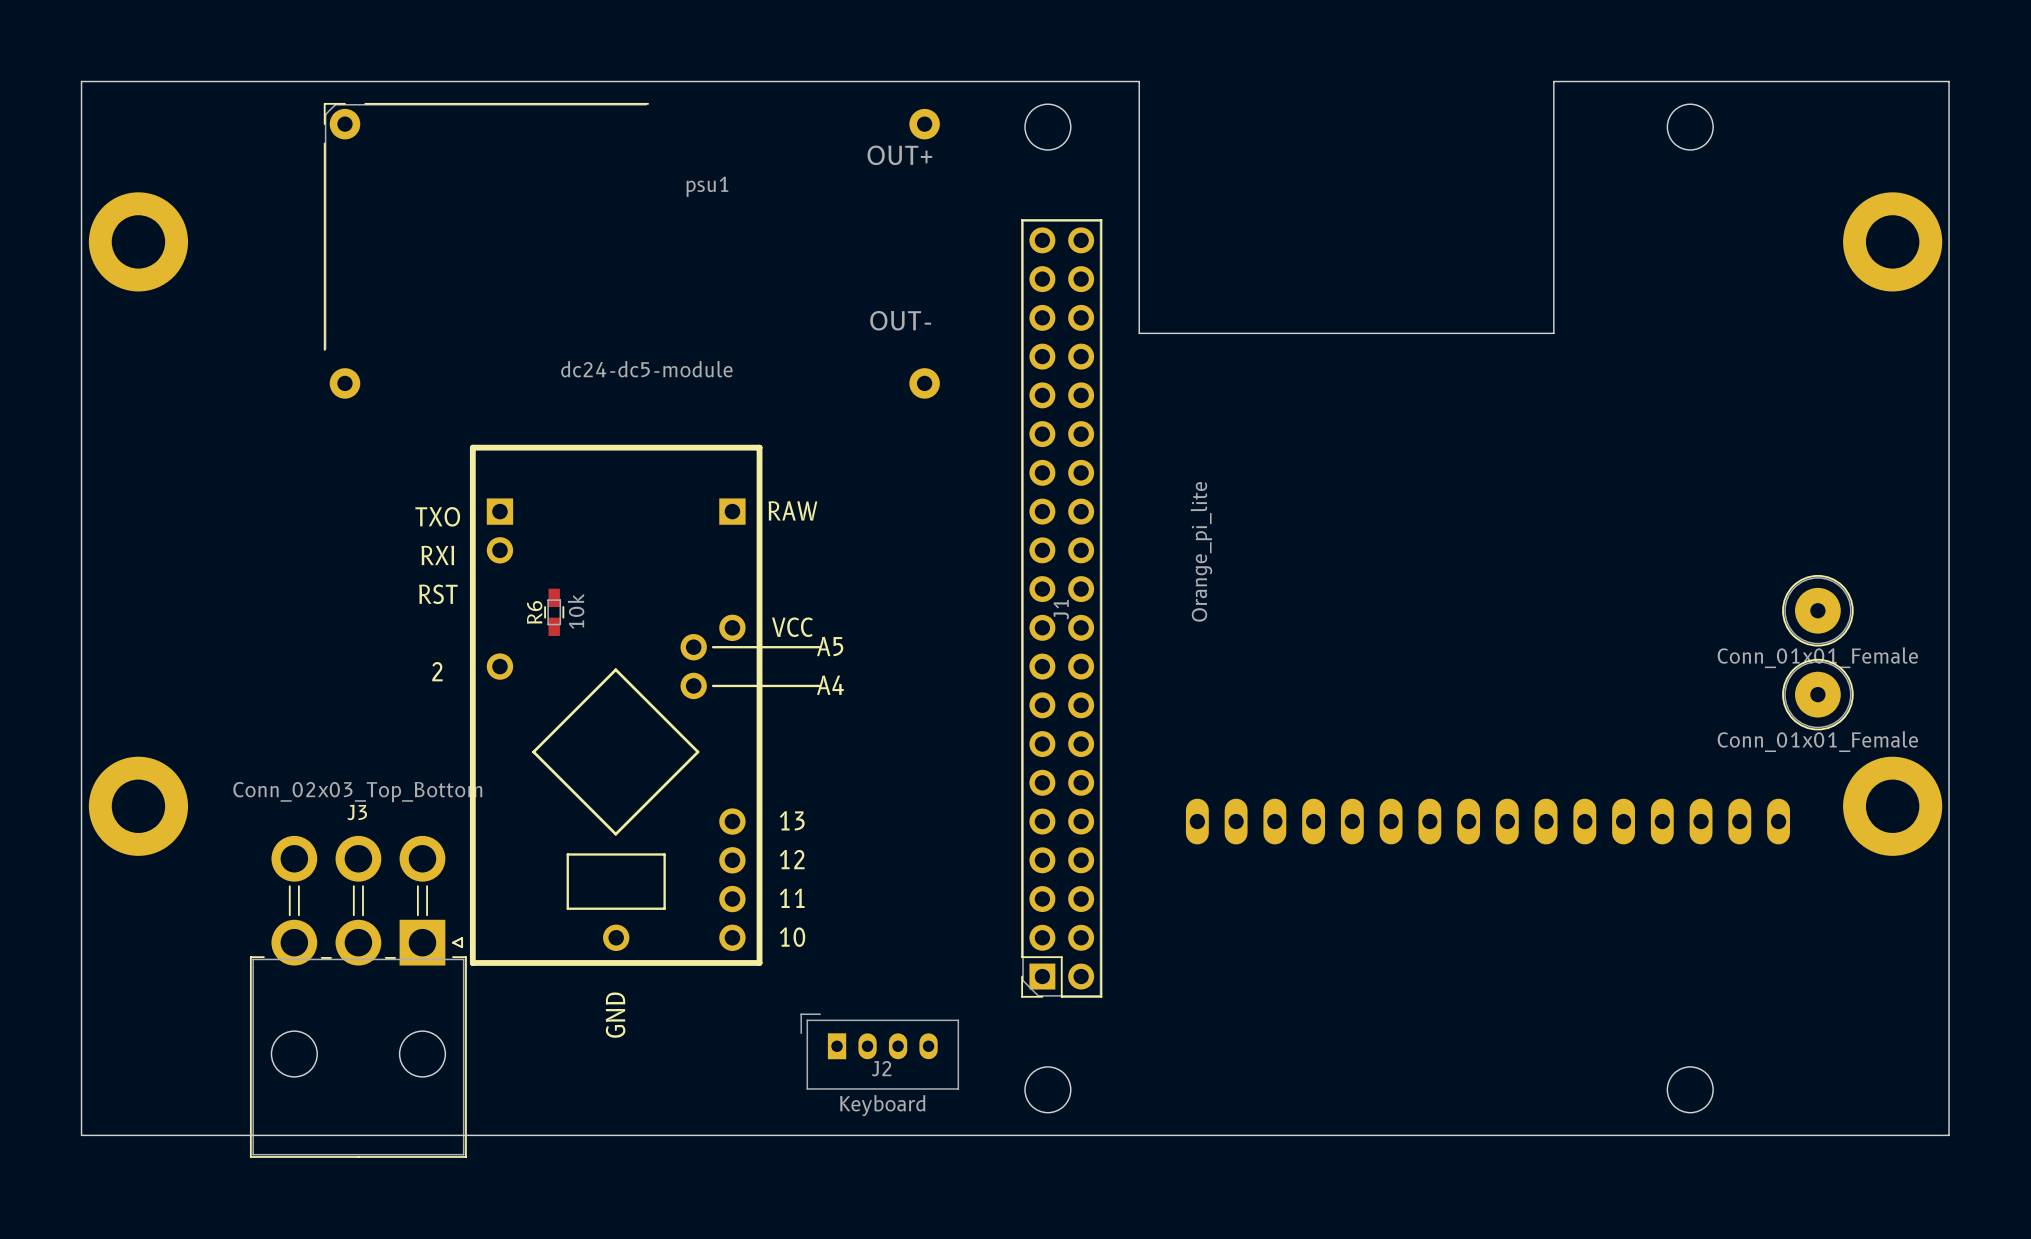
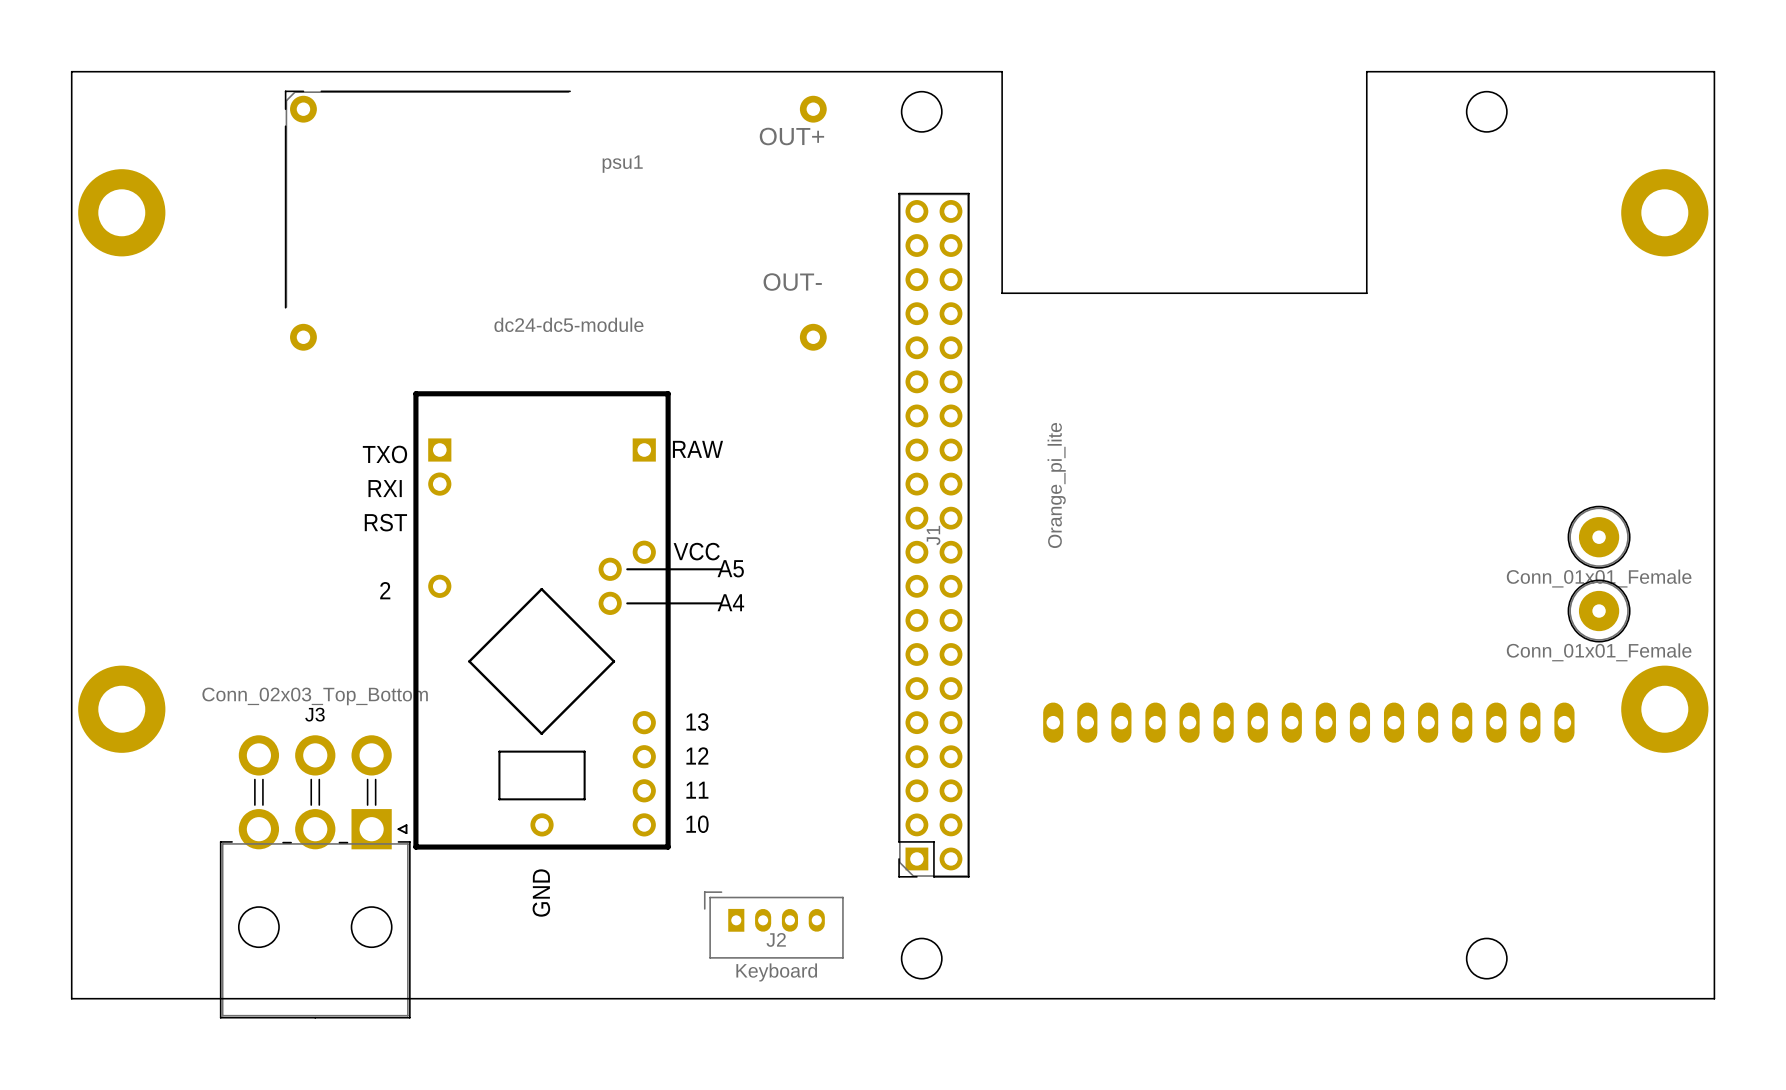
R6: 10k (554, 612) -> none

